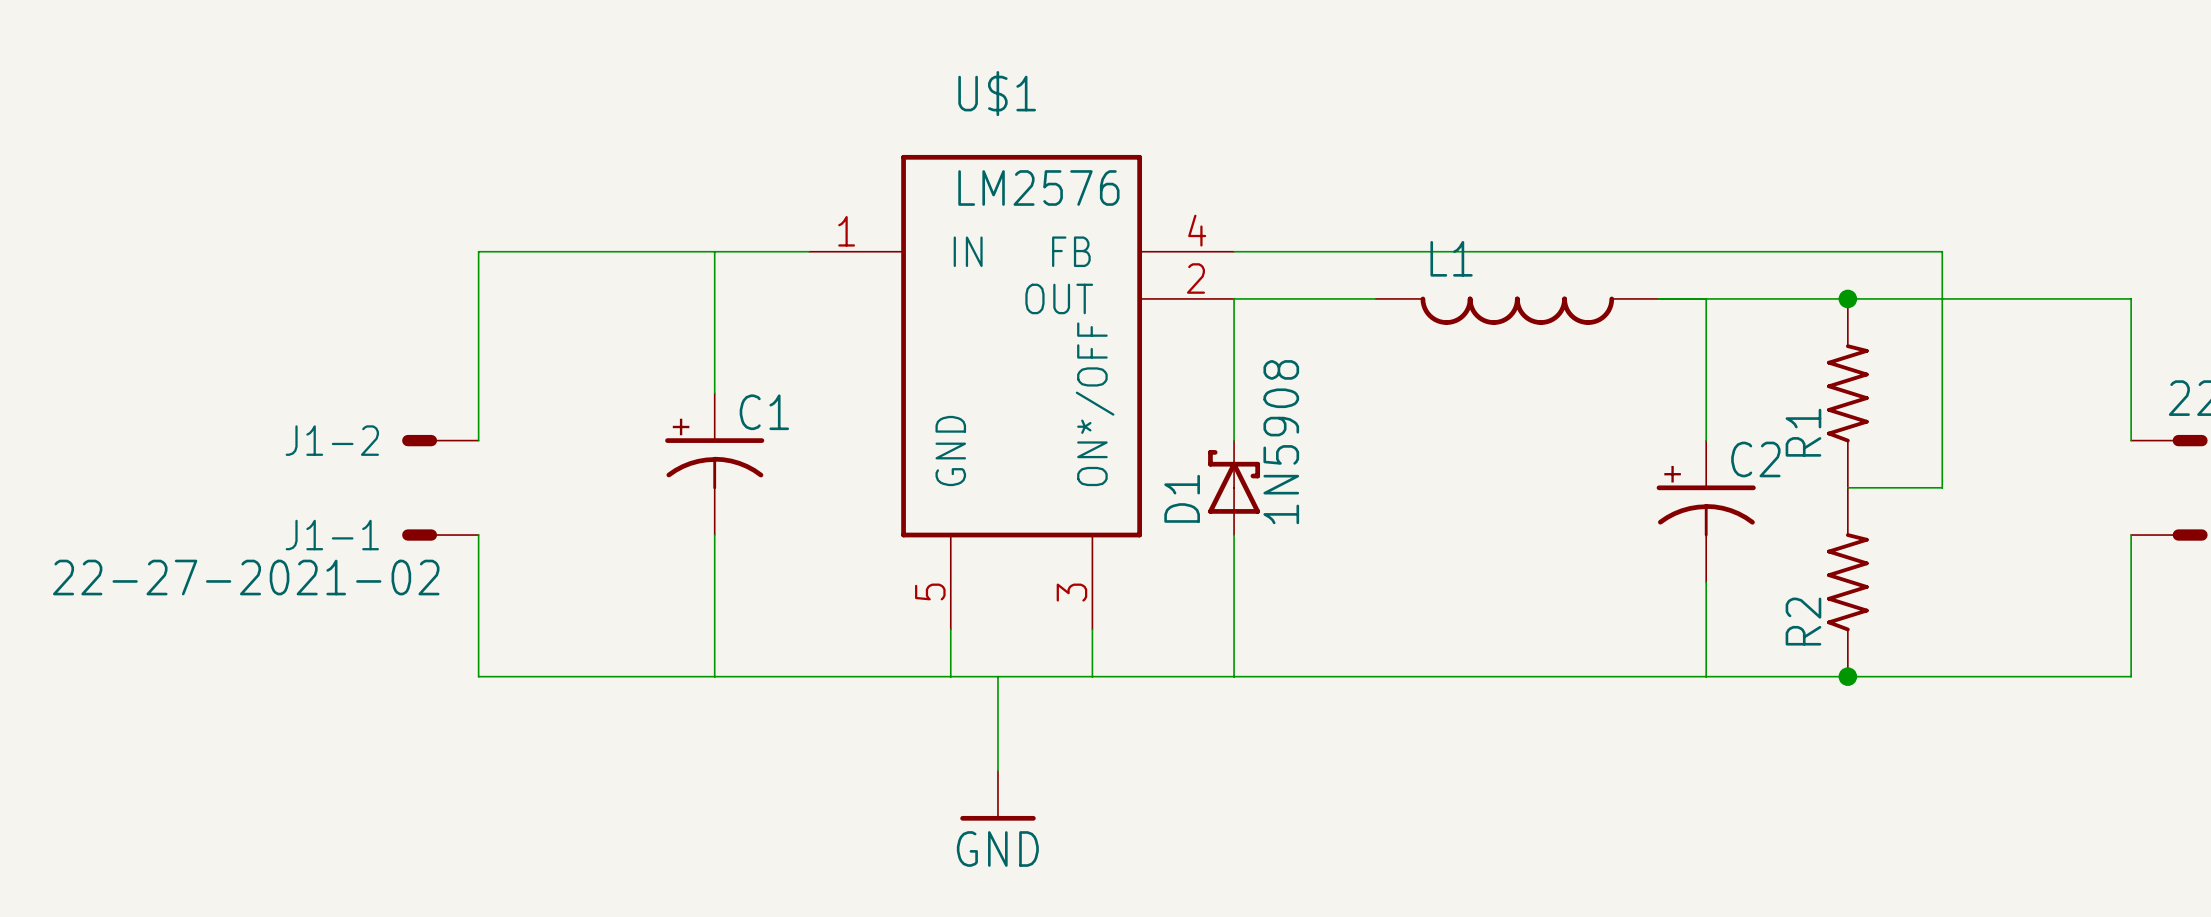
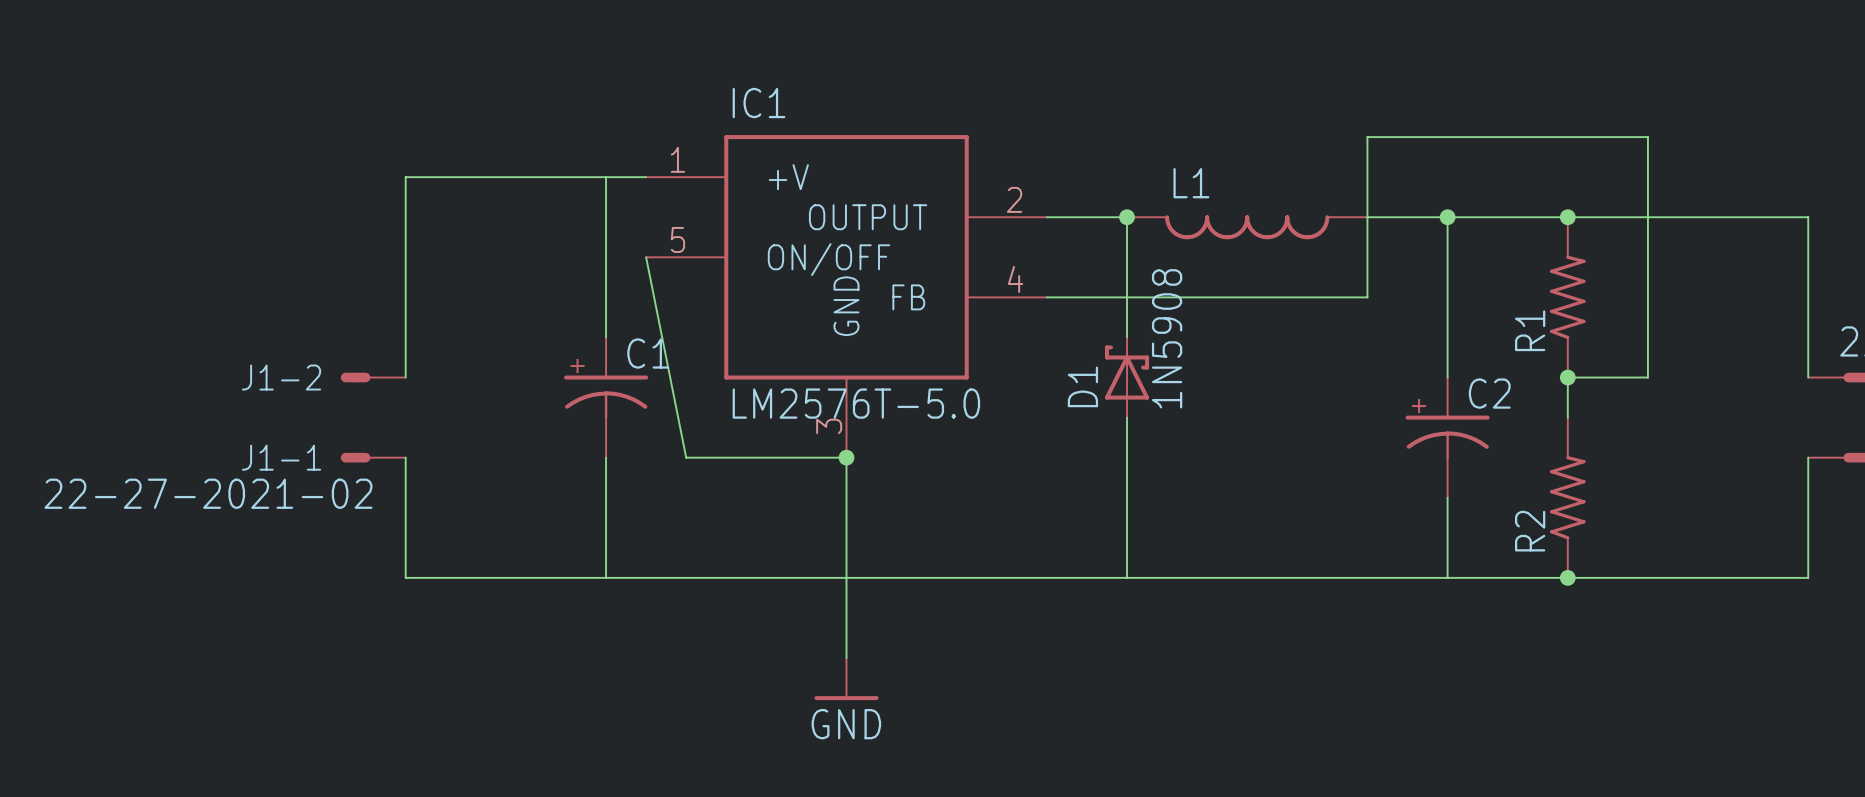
wire: none -> (606, 177) (606, 217)
wire: (478, 251) (809, 251) -> (405, 217) (405, 177) (646, 177)
wire: (1328, 251) (1611, 251) -> (1127, 217) (1127, 337)
junction: none -> (1127, 217)
wire: none -> (1447, 217) (1447, 257)
junction: none -> (1447, 217)
wire: none -> (646, 257) (686, 457) (846, 457) (846, 577)
wire: (1375, 298) (1234, 298) (1234, 440) -> none
wire: (1658, 298) (2131, 298) -> (1046, 297) (1367, 297) (1367, 137) (1647, 137) (1647, 217) (1808, 217) (1808, 257)
junction position: (1847, 298) -> (1567, 217)
L1 position: (1517, 310) -> (1247, 227)
IC1: none -> LM2576T-5.0 (846, 296)
U$1: LM2576 (1021, 392) -> none
R1 position: (1847, 393) -> (1567, 297)
junction: none -> (1567, 377)
wire: (1942, 440) (1942, 487) (1847, 487) -> (1647, 377) (1567, 377) (1567, 417)
D1 position: (1234, 487) -> (1127, 377)
wire: none -> (1127, 417) (1127, 577)
junction: none -> (846, 457)
wire: (1234, 535) (1234, 676) -> none
wire: (950, 629) (950, 676) -> none
wire: (1092, 629) (1092, 676) -> none

